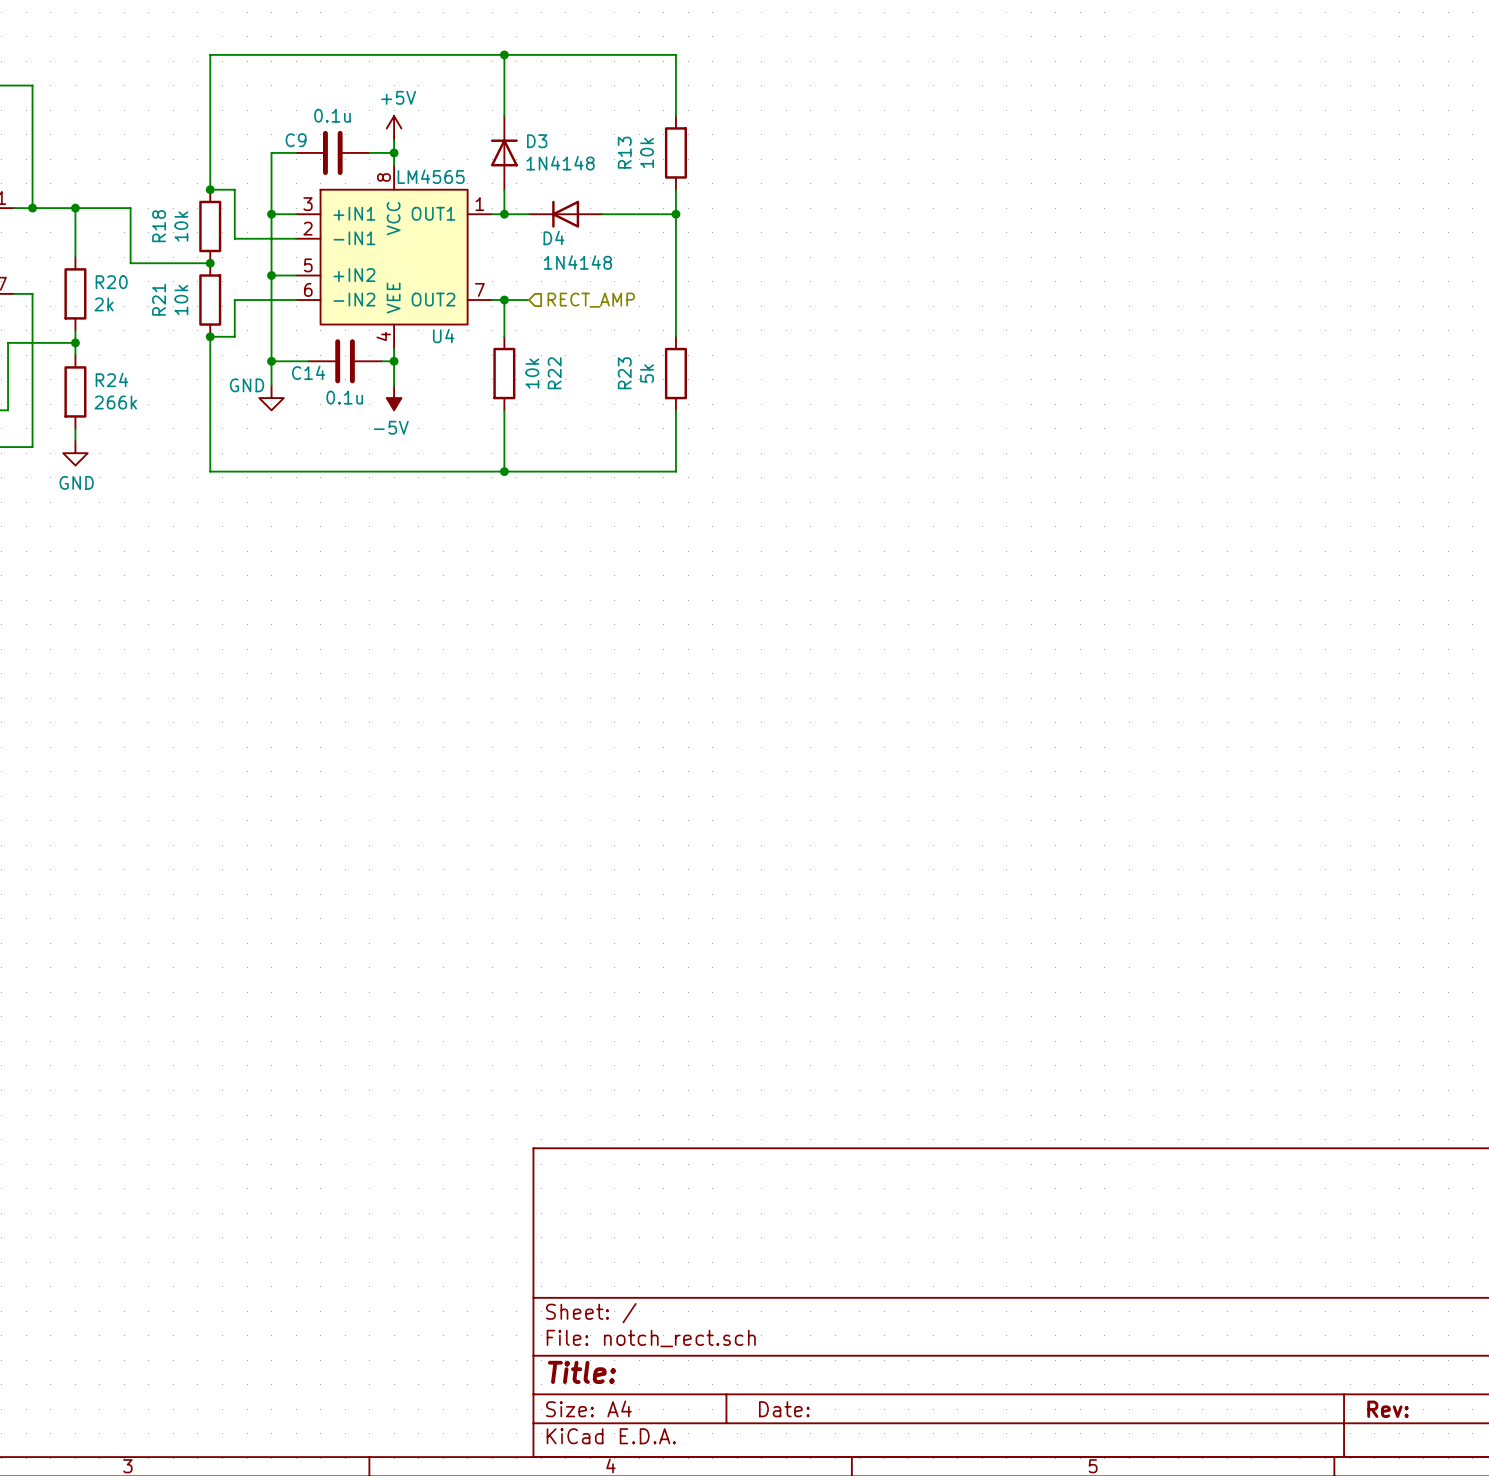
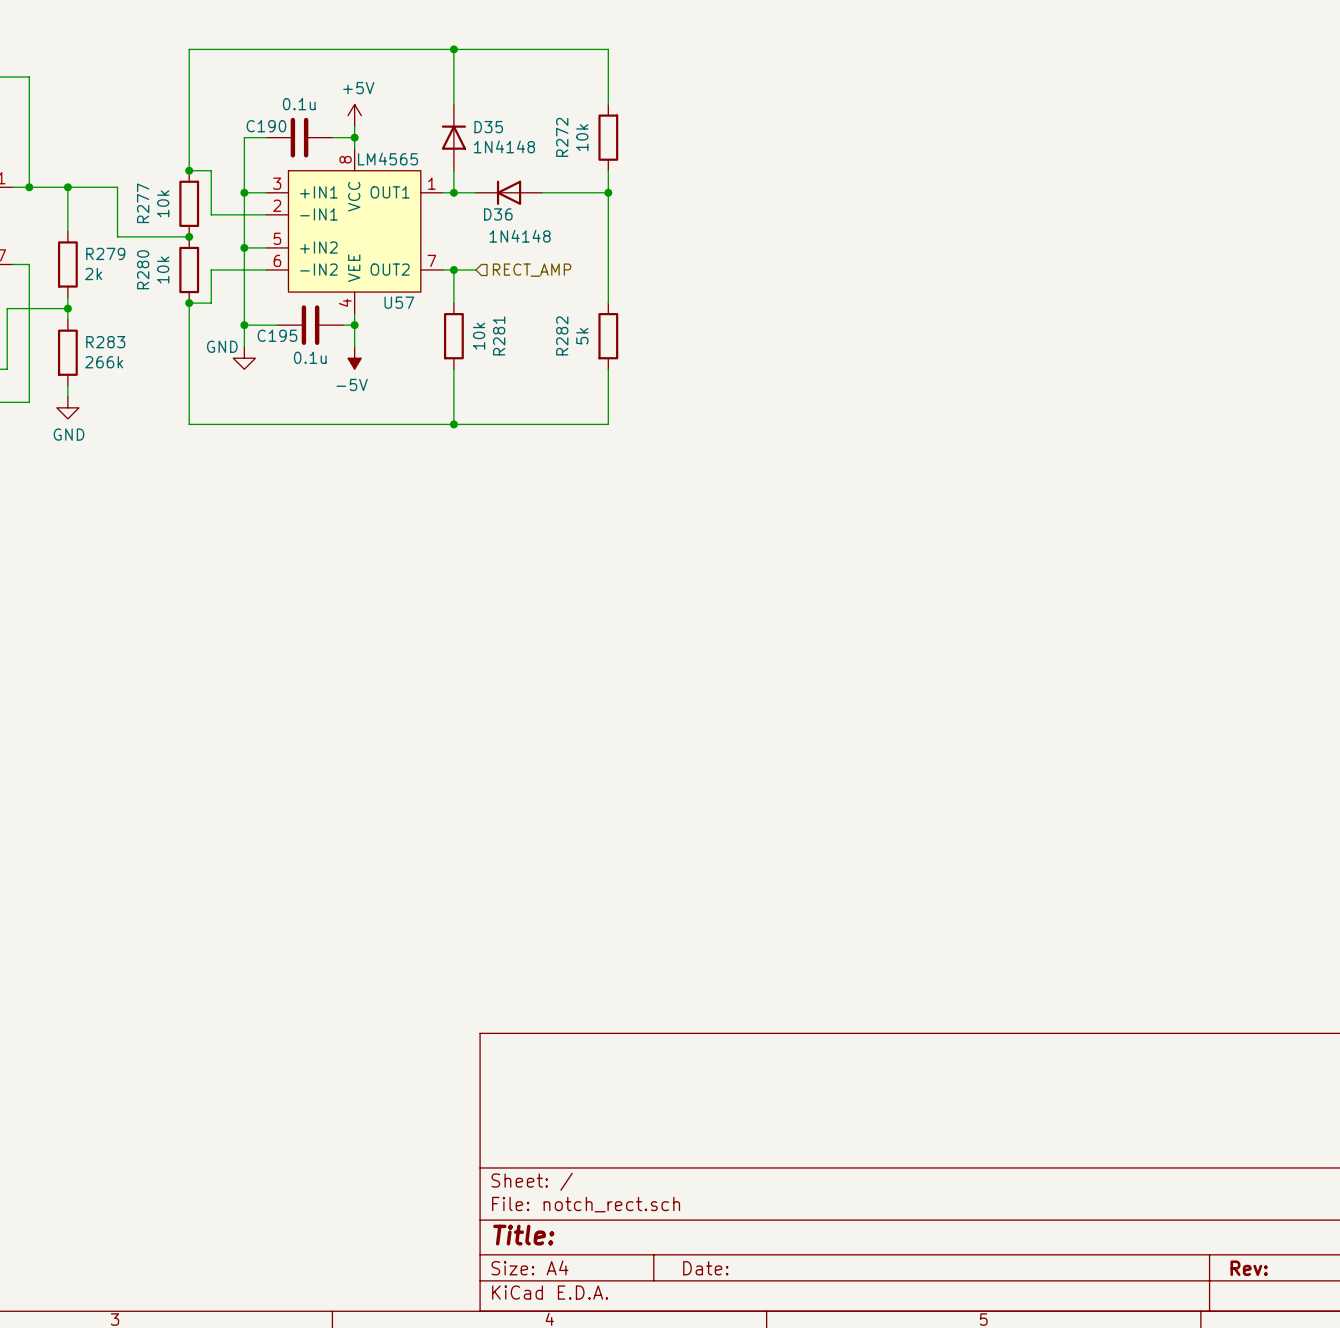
C9 name: C9 (296, 140) -> C190 (266, 126)
D3 name: D3 (537, 141) -> D35 (488, 127)
R13 name: R13 (624, 152) -> R272 (562, 137)
R18 name: R18 (159, 226) -> R277 (143, 203)
D4 name: D4 (553, 237) -> D36 (498, 214)
R20 name: R20 (111, 282) -> R279 (105, 253)
R21 name: R21 (159, 299) -> R280 (143, 269)
U4 name: U4 (443, 336) -> U57 (399, 302)
C14 name: C14 (308, 372) -> C195 (277, 335)
R22 name: R22 (554, 373) -> R281 (499, 335)
R23 name: R23 (624, 373) -> R282 (562, 335)
R24 name: R24 (111, 379) -> R283 (105, 342)

